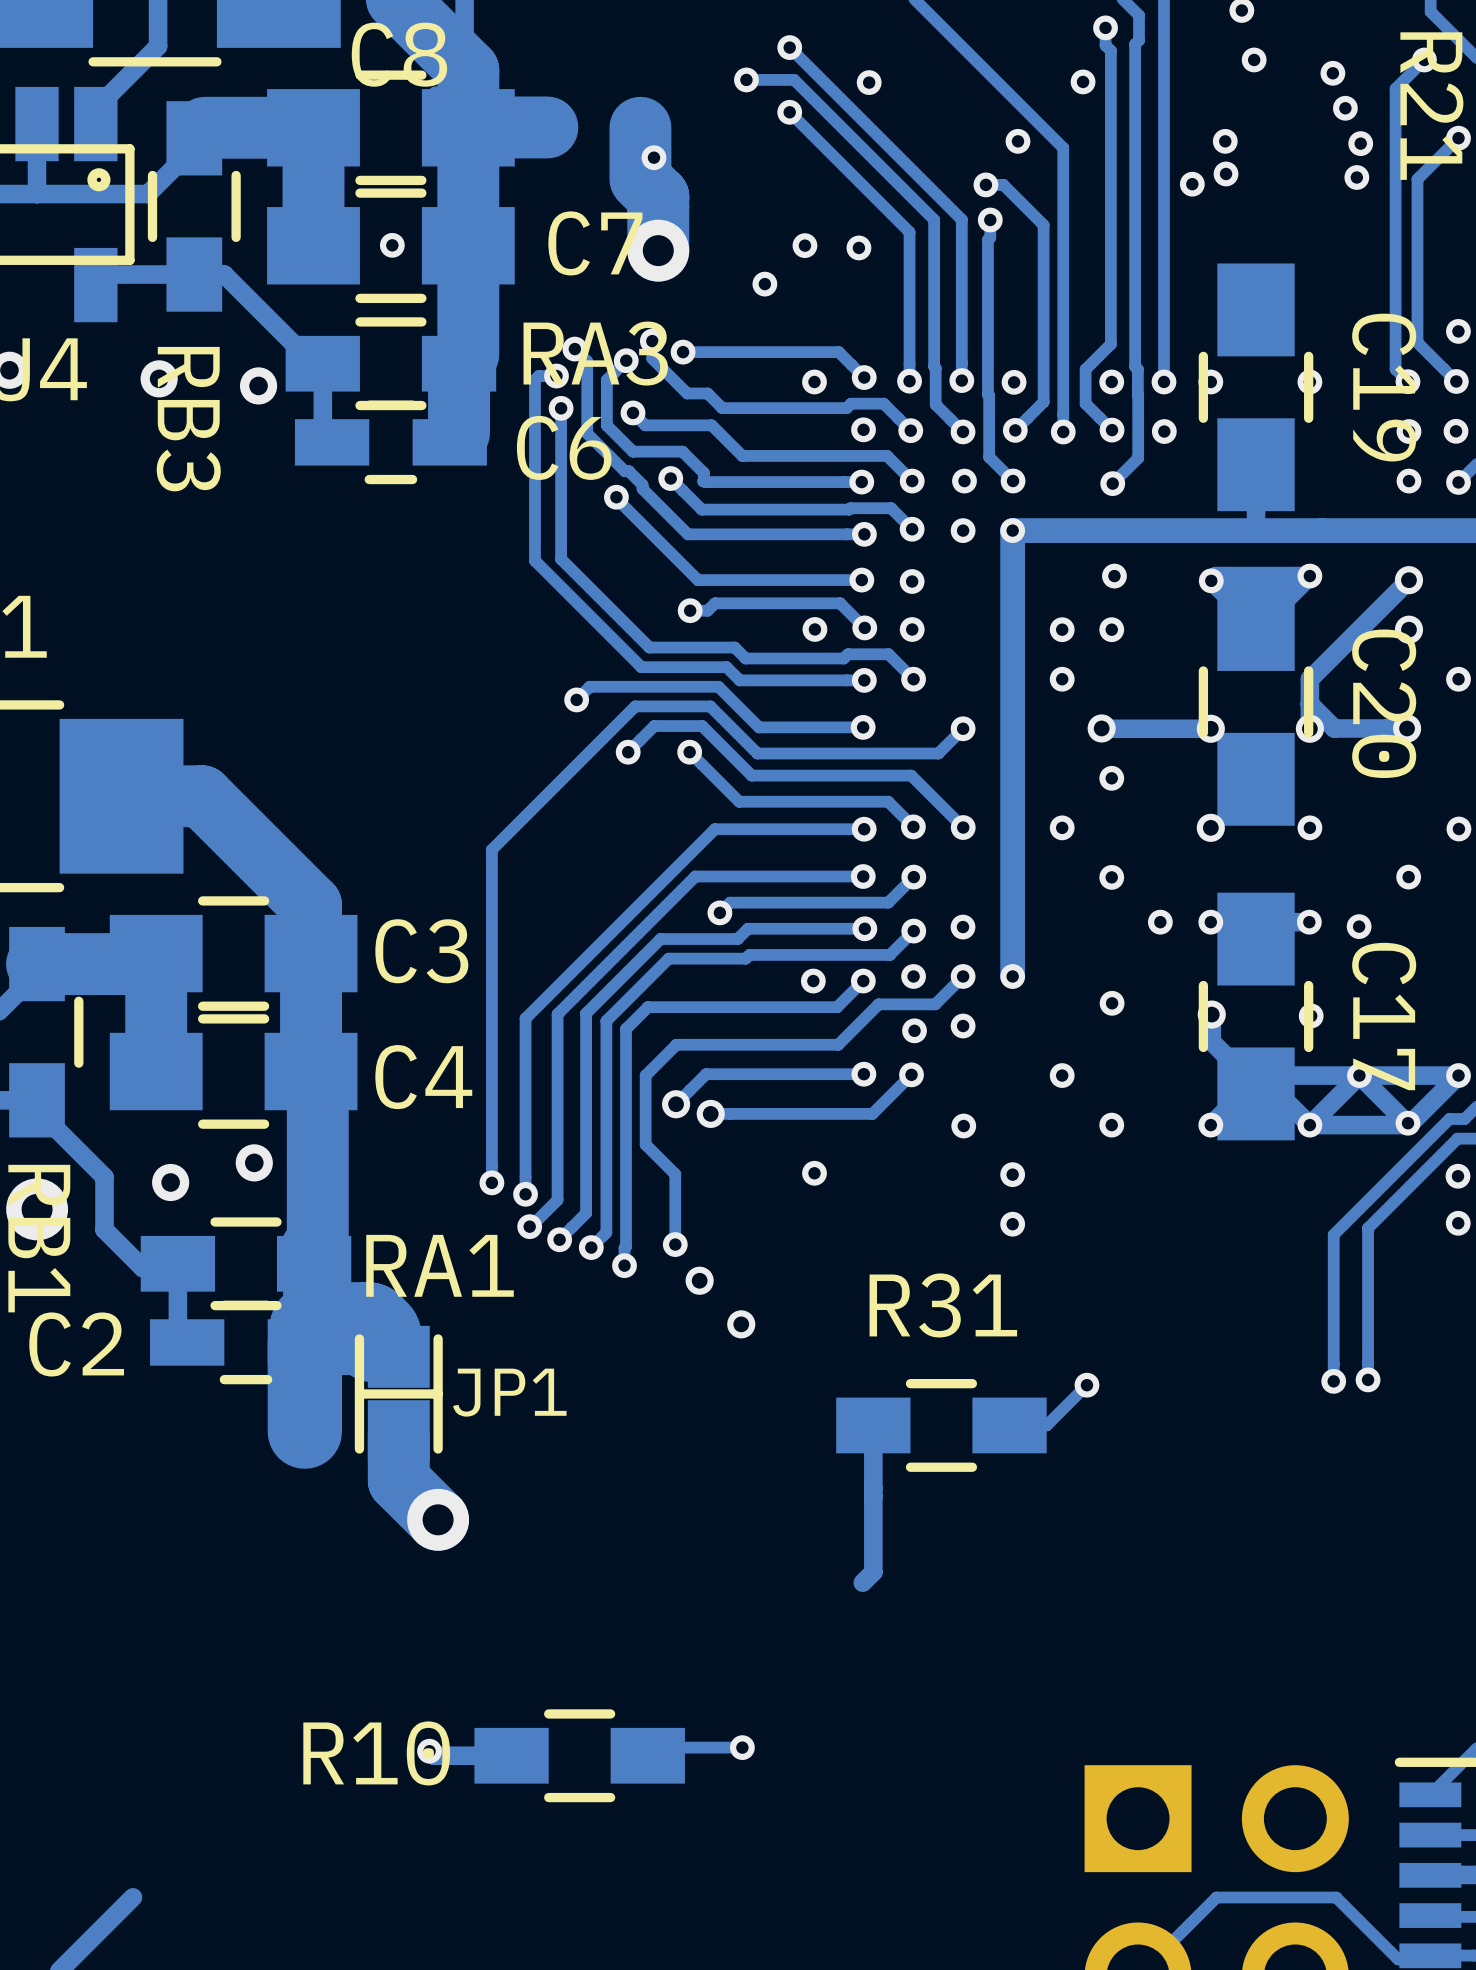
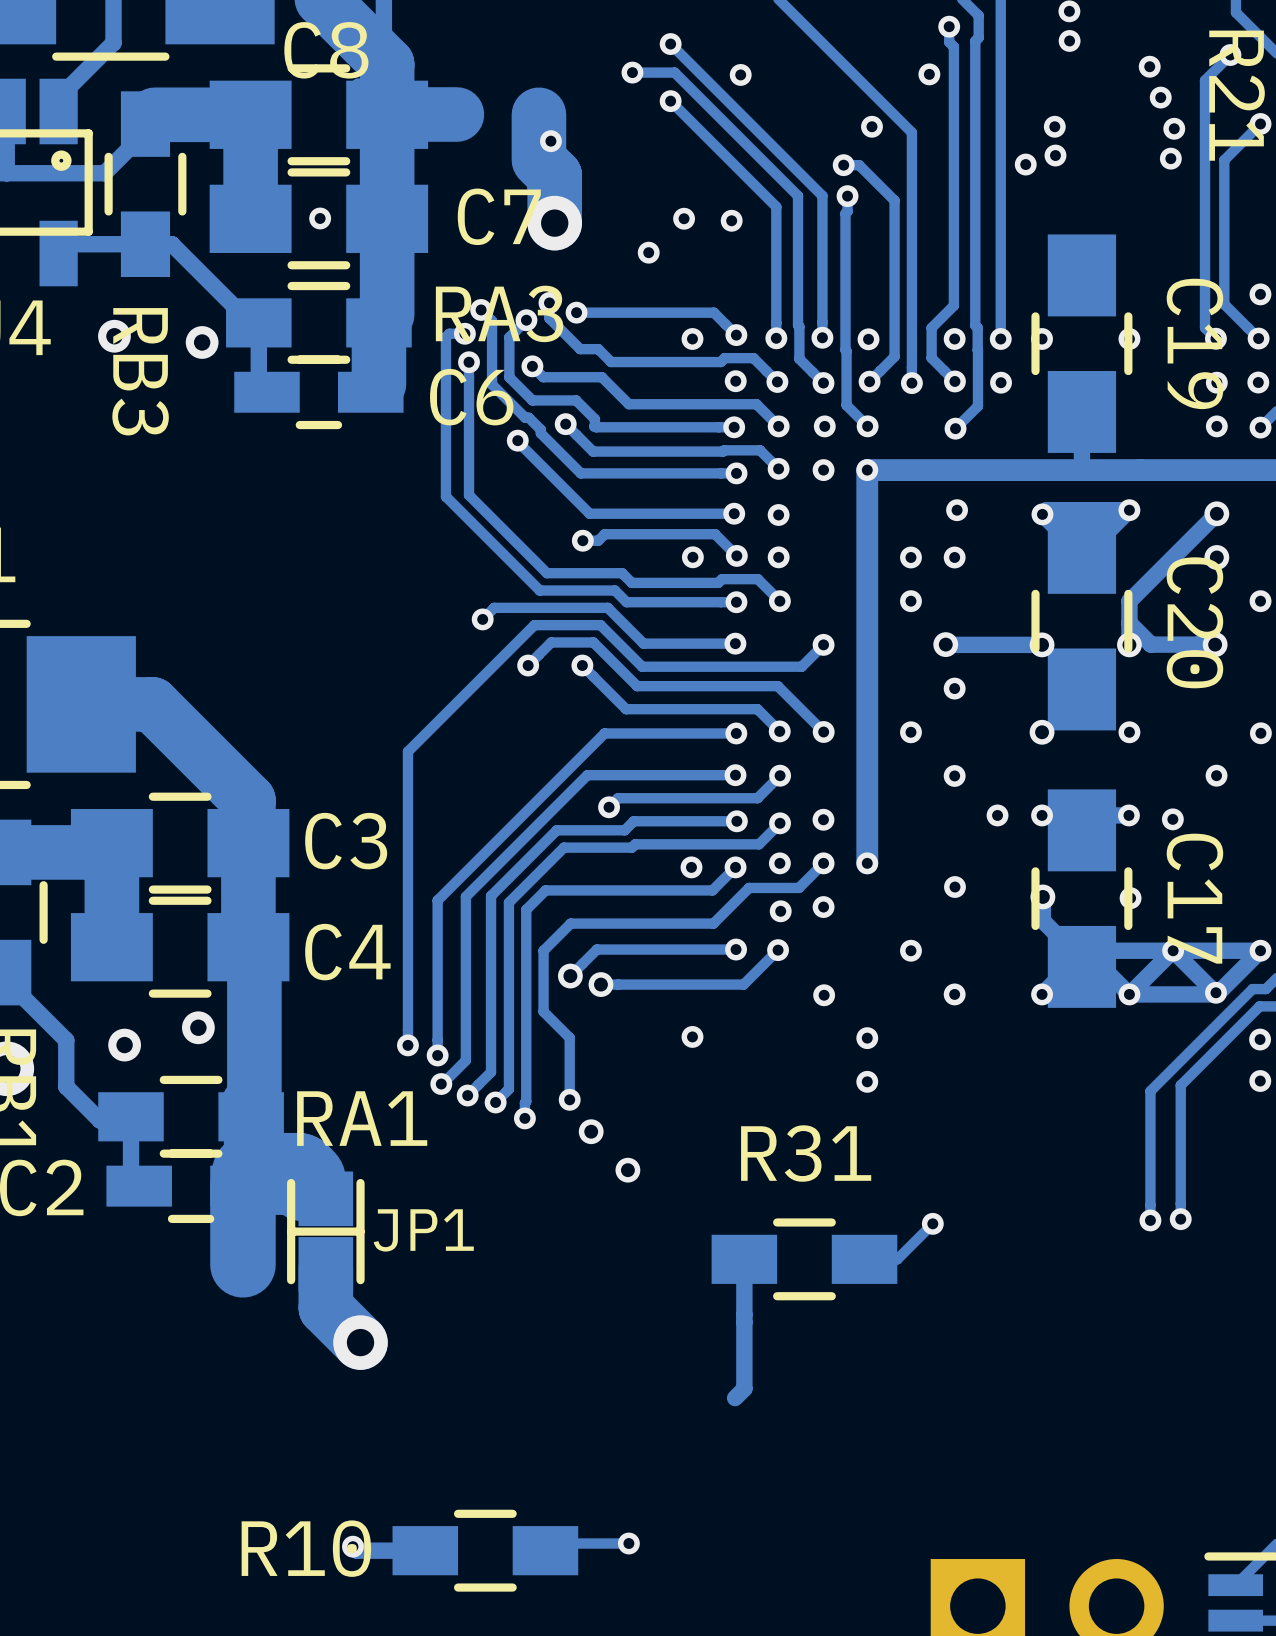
via position: (1254, 59) -> (1069, 40)

